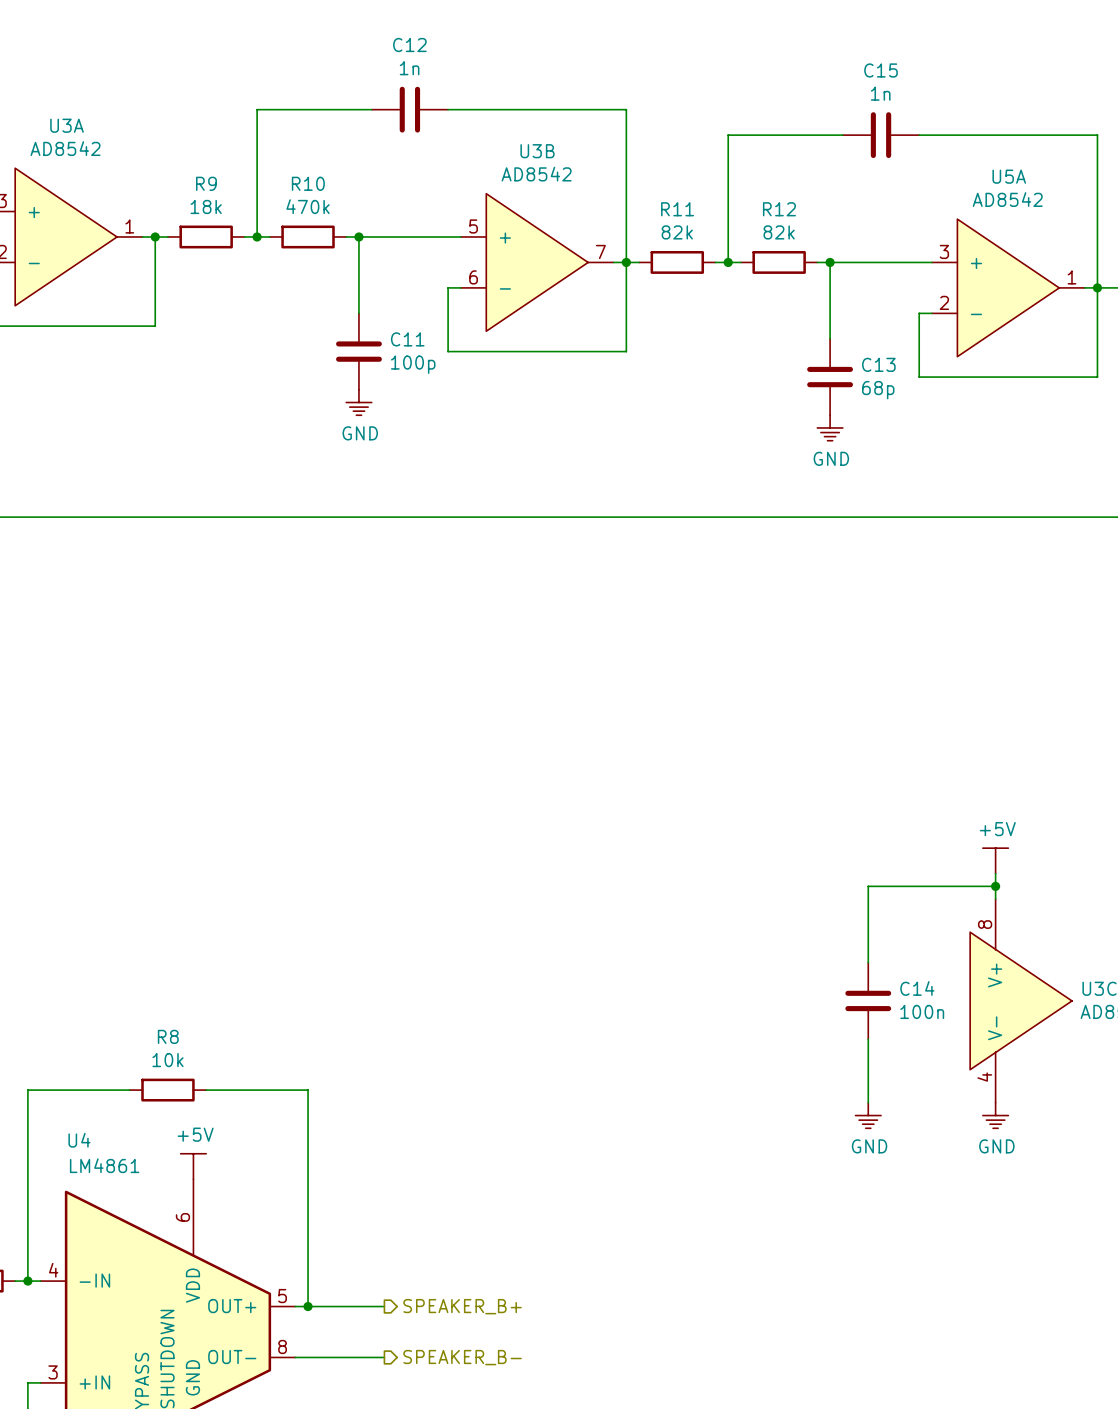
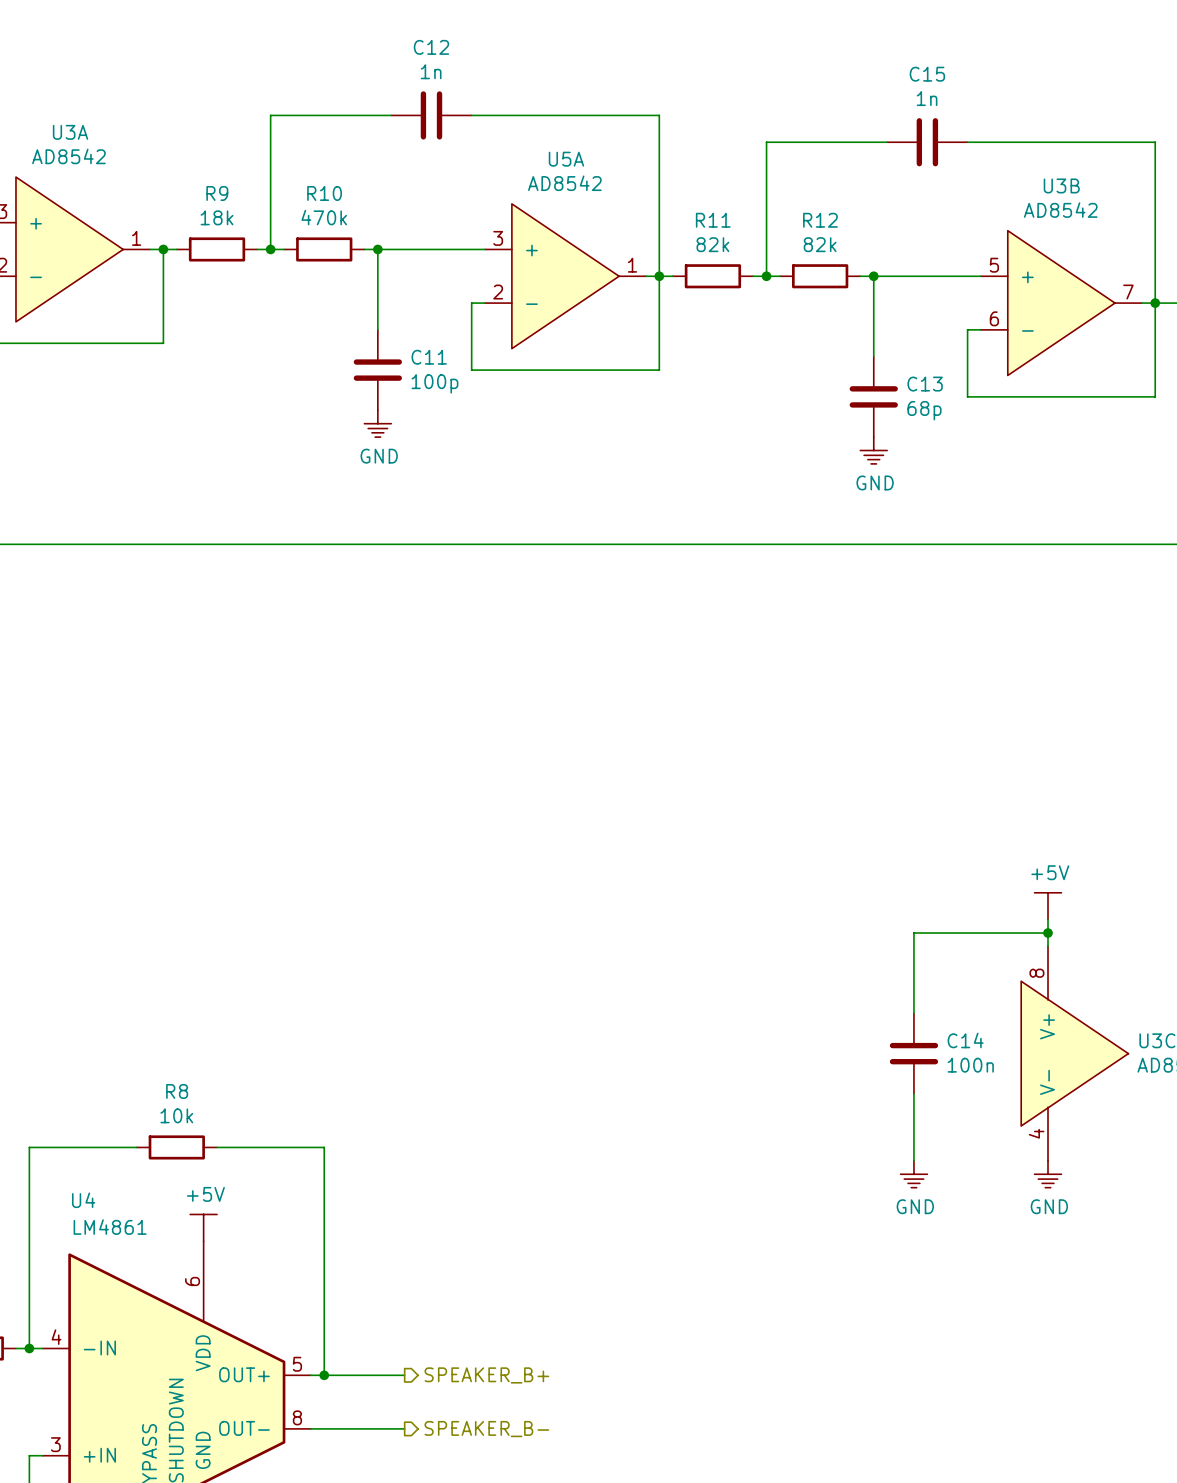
U3B position: (537, 262) -> (1061, 303)
U5A position: (1008, 287) -> (565, 276)

